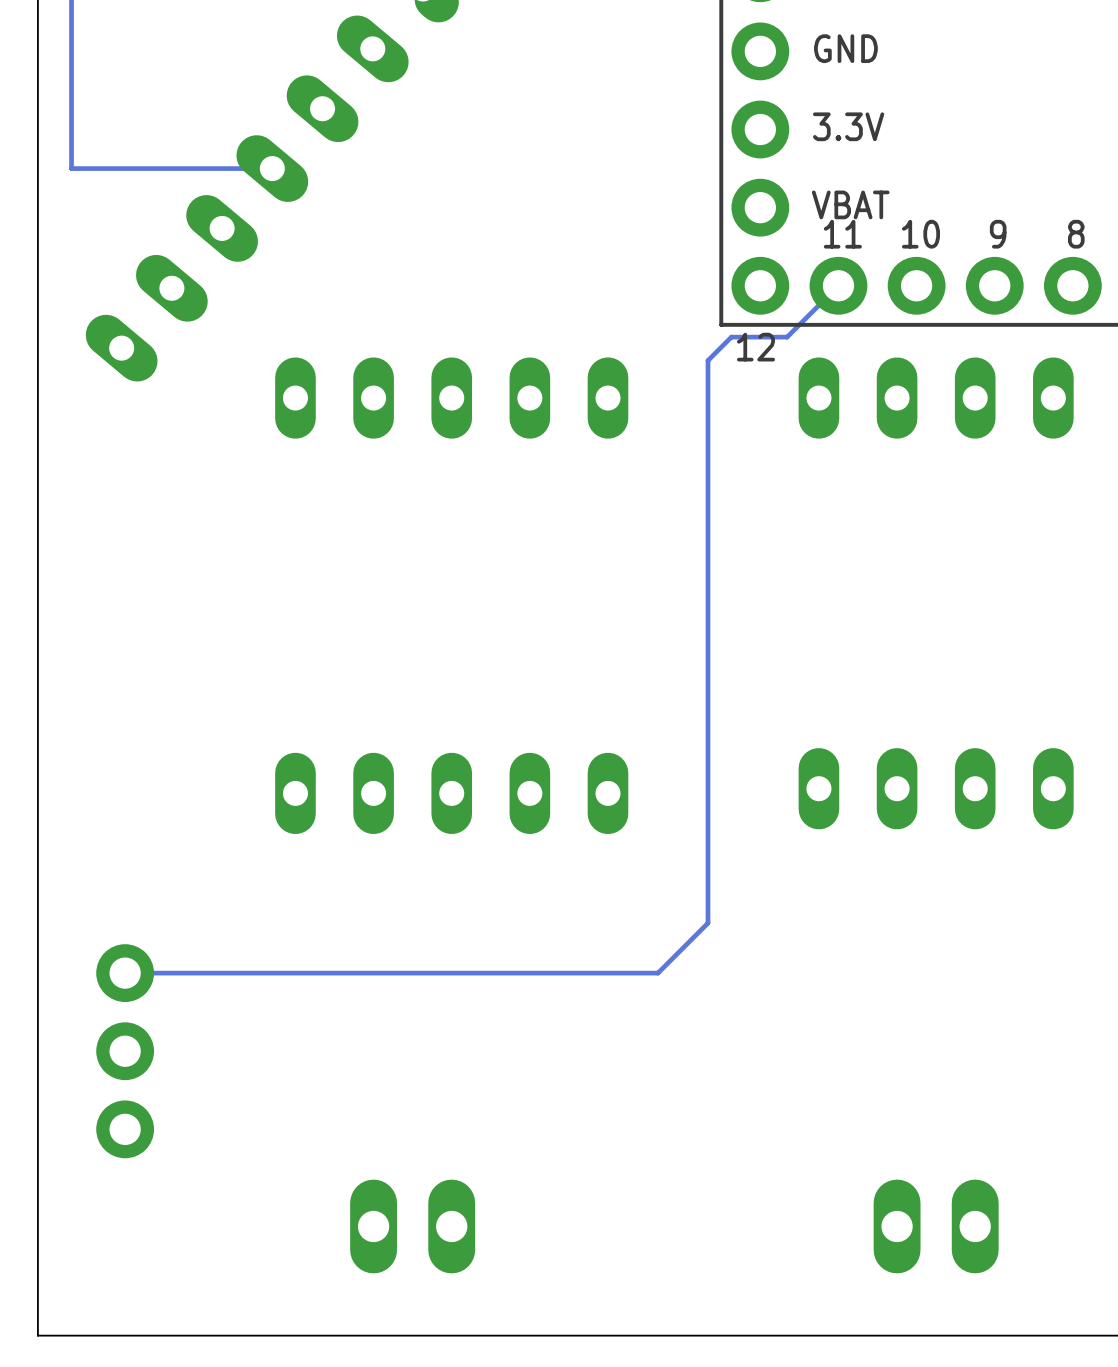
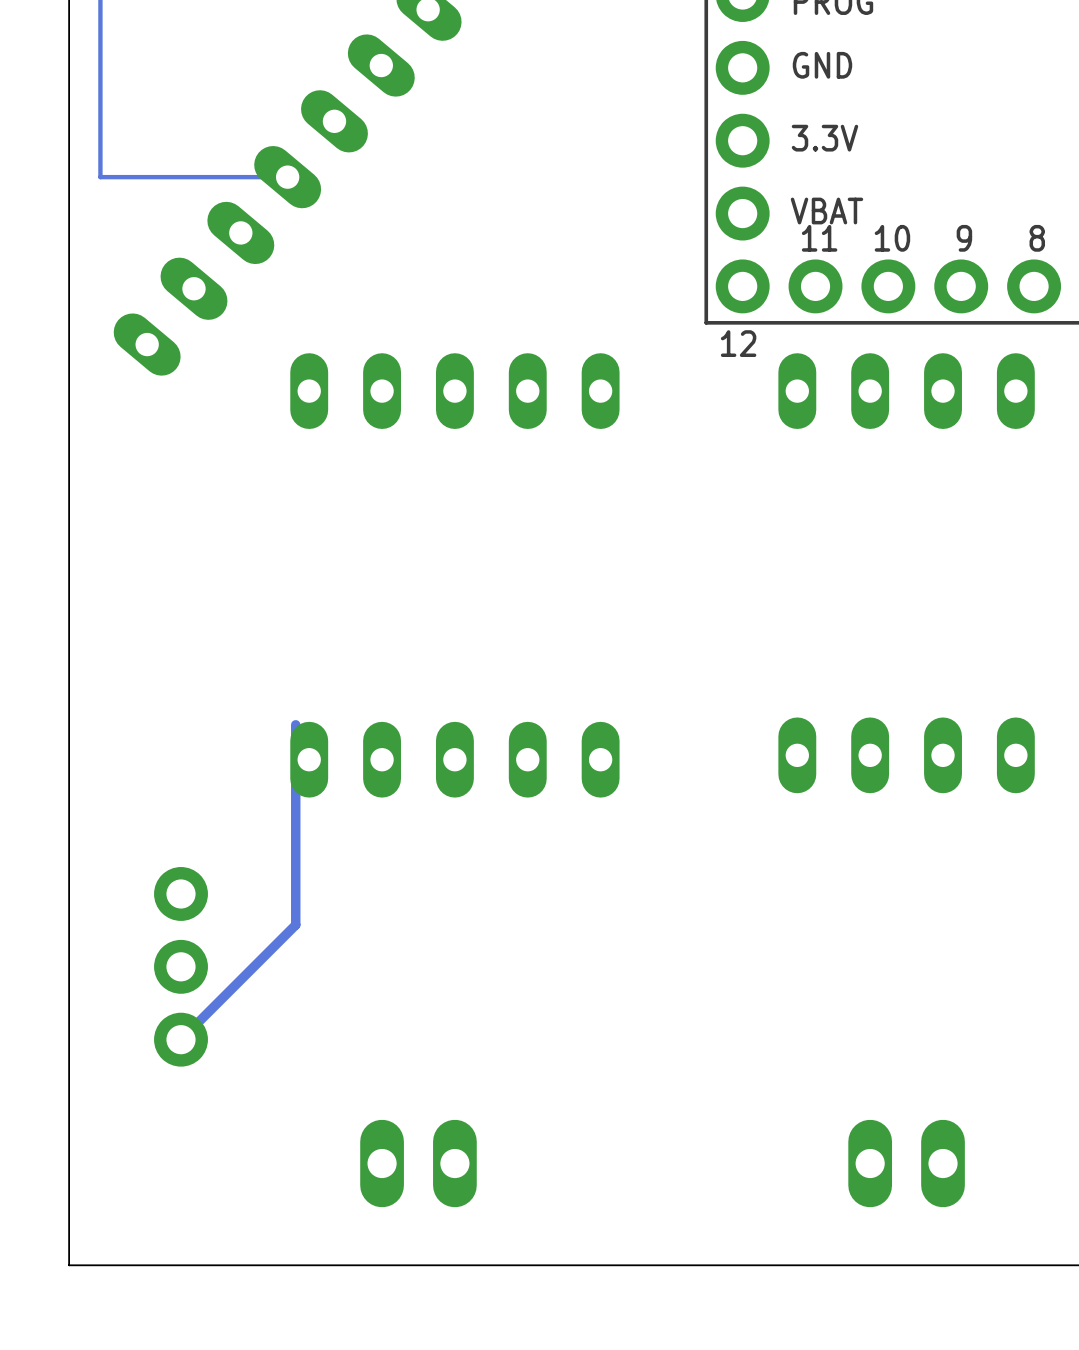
track: (838, 285) (787, 337) (731, 337) (708, 360) (708, 923) (657, 973) (125, 973) -> none
track: none -> (295, 724) (295, 924) (181, 1039)
part position: (125, 1051) -> (181, 966)

